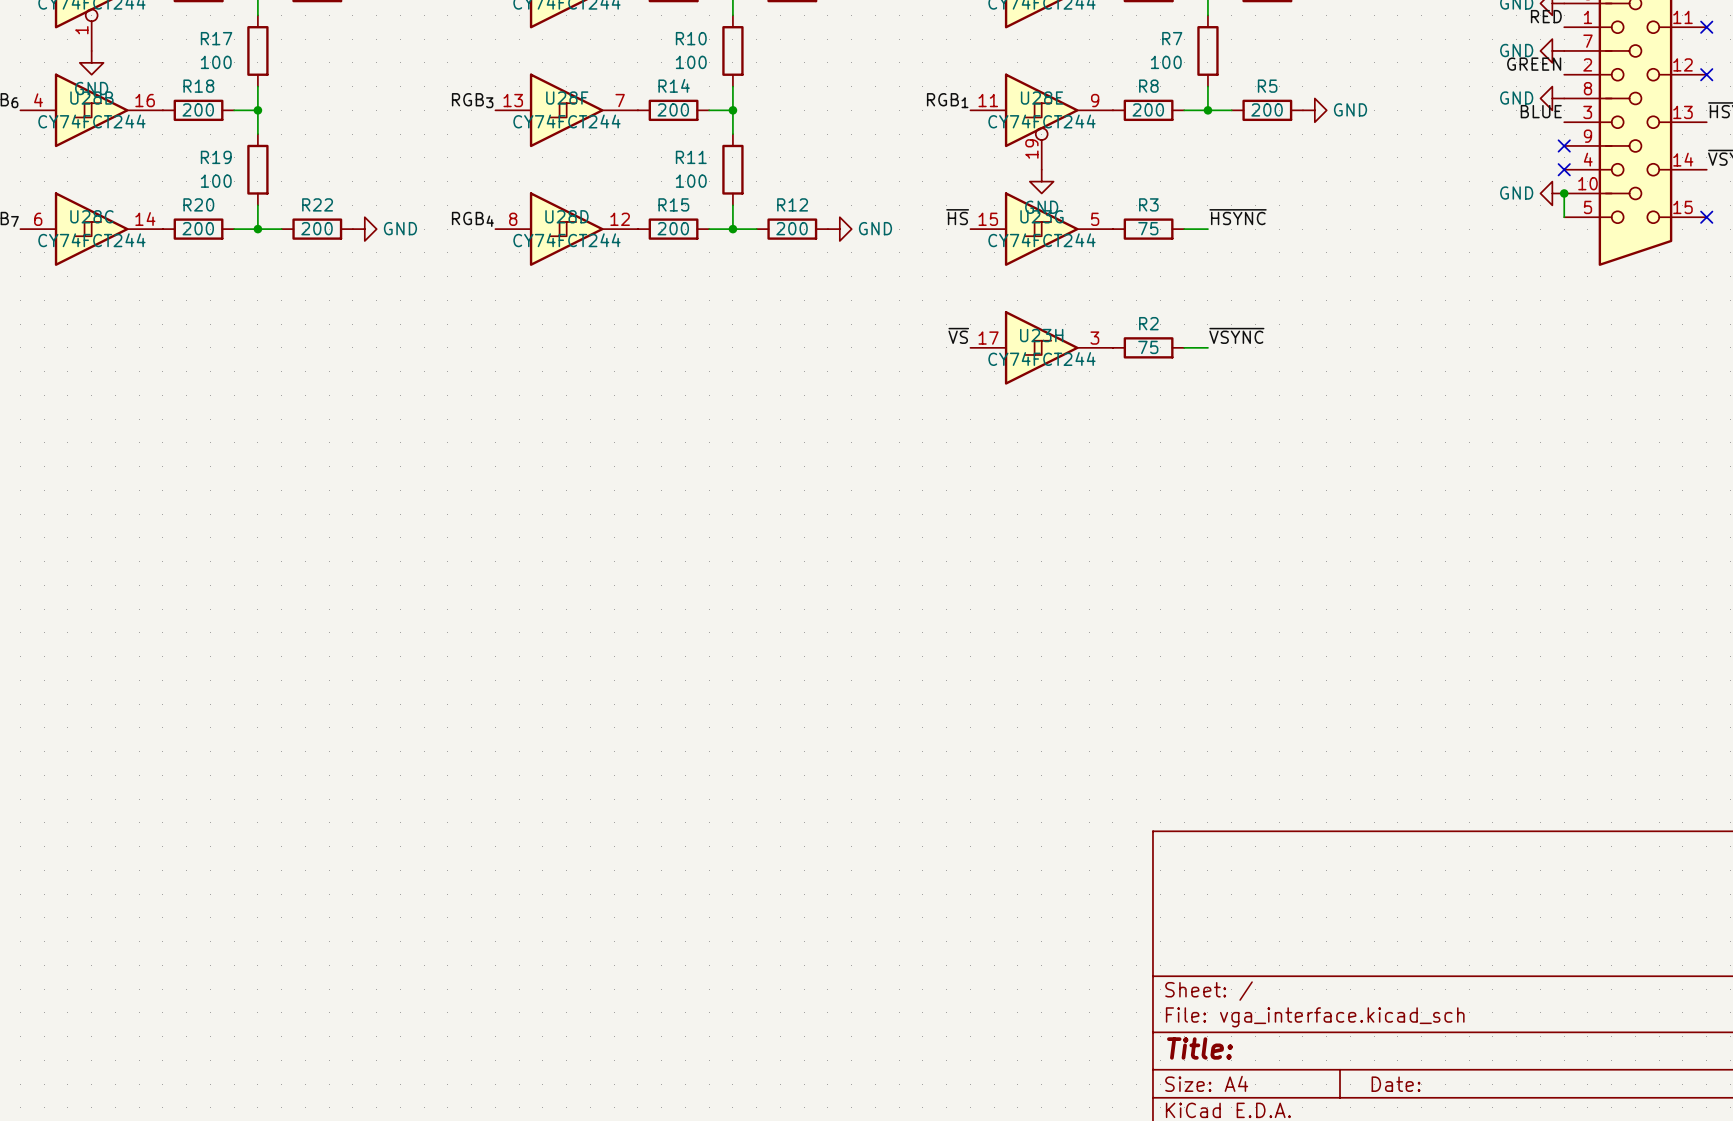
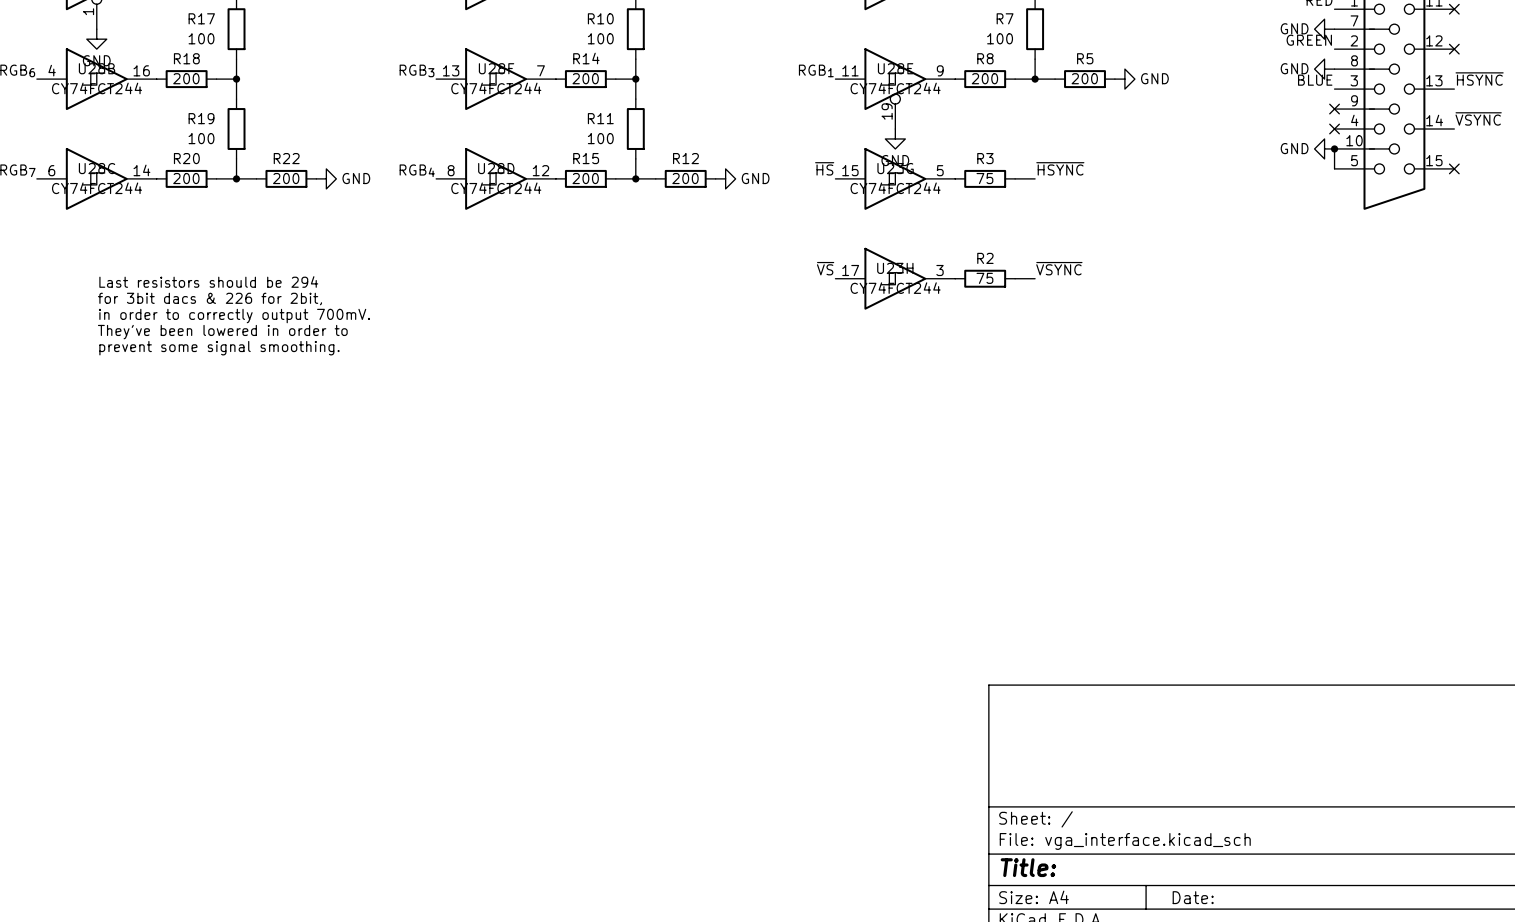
text: none -> Last resistors should be 294 (208, 281)
text: none -> for 3bit dacs & 226 for 2bit, (209, 299)
text: none -> in order to correctly output 700mV. (234, 316)
text: none -> They've been lowered in order to (222, 332)
text: none -> prevent some signal smoothing. (219, 348)

